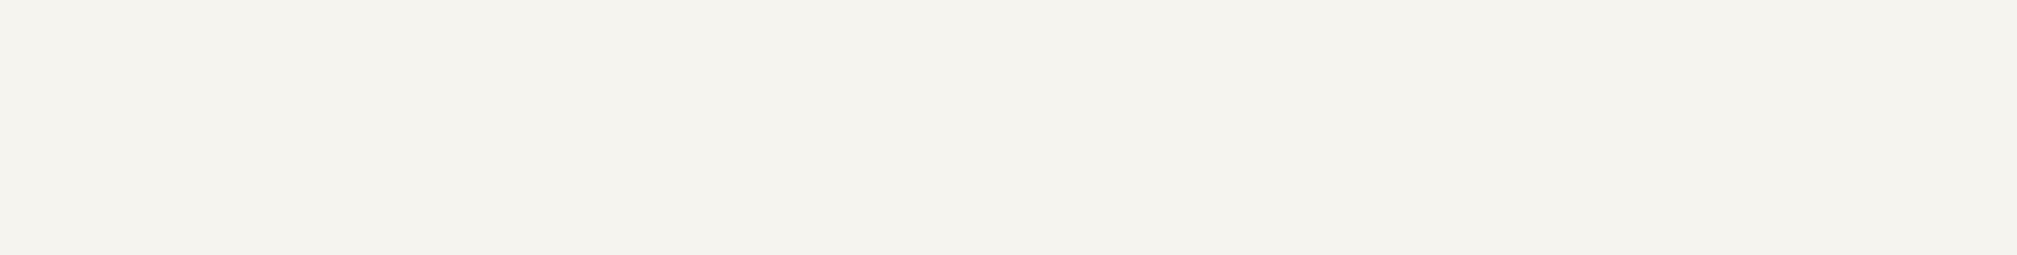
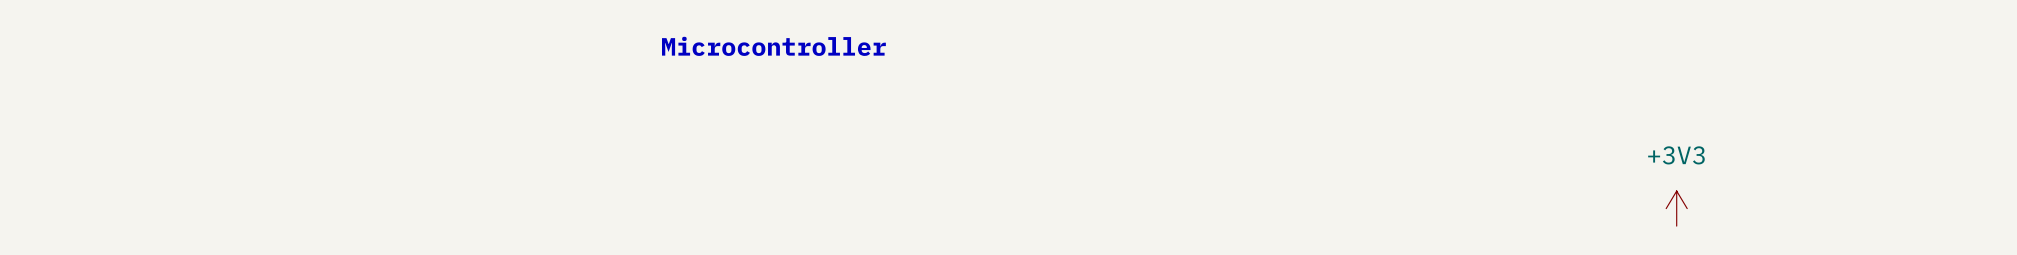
text: none -> Microcontroller (773, 46)
power symbol: none -> +3V3 (1676, 208)

